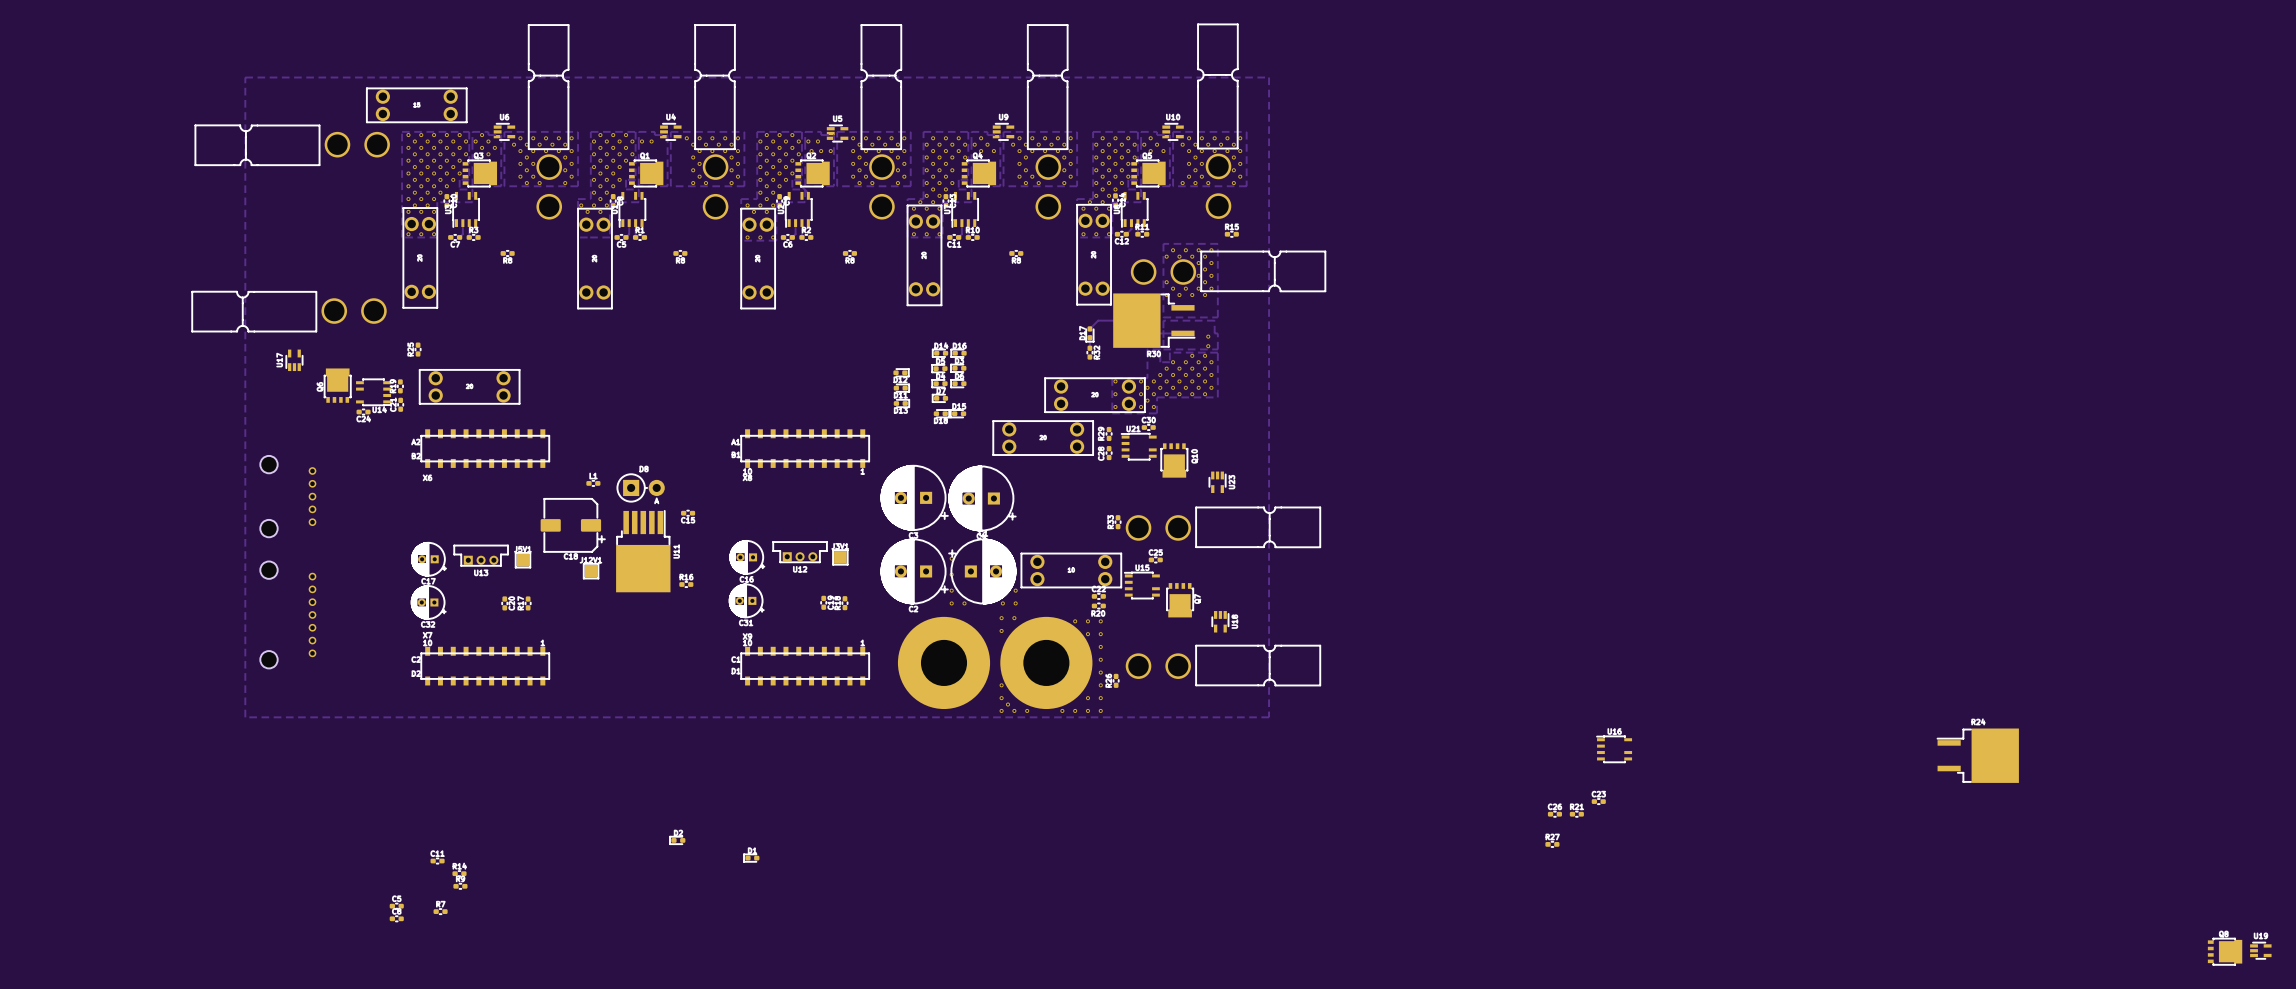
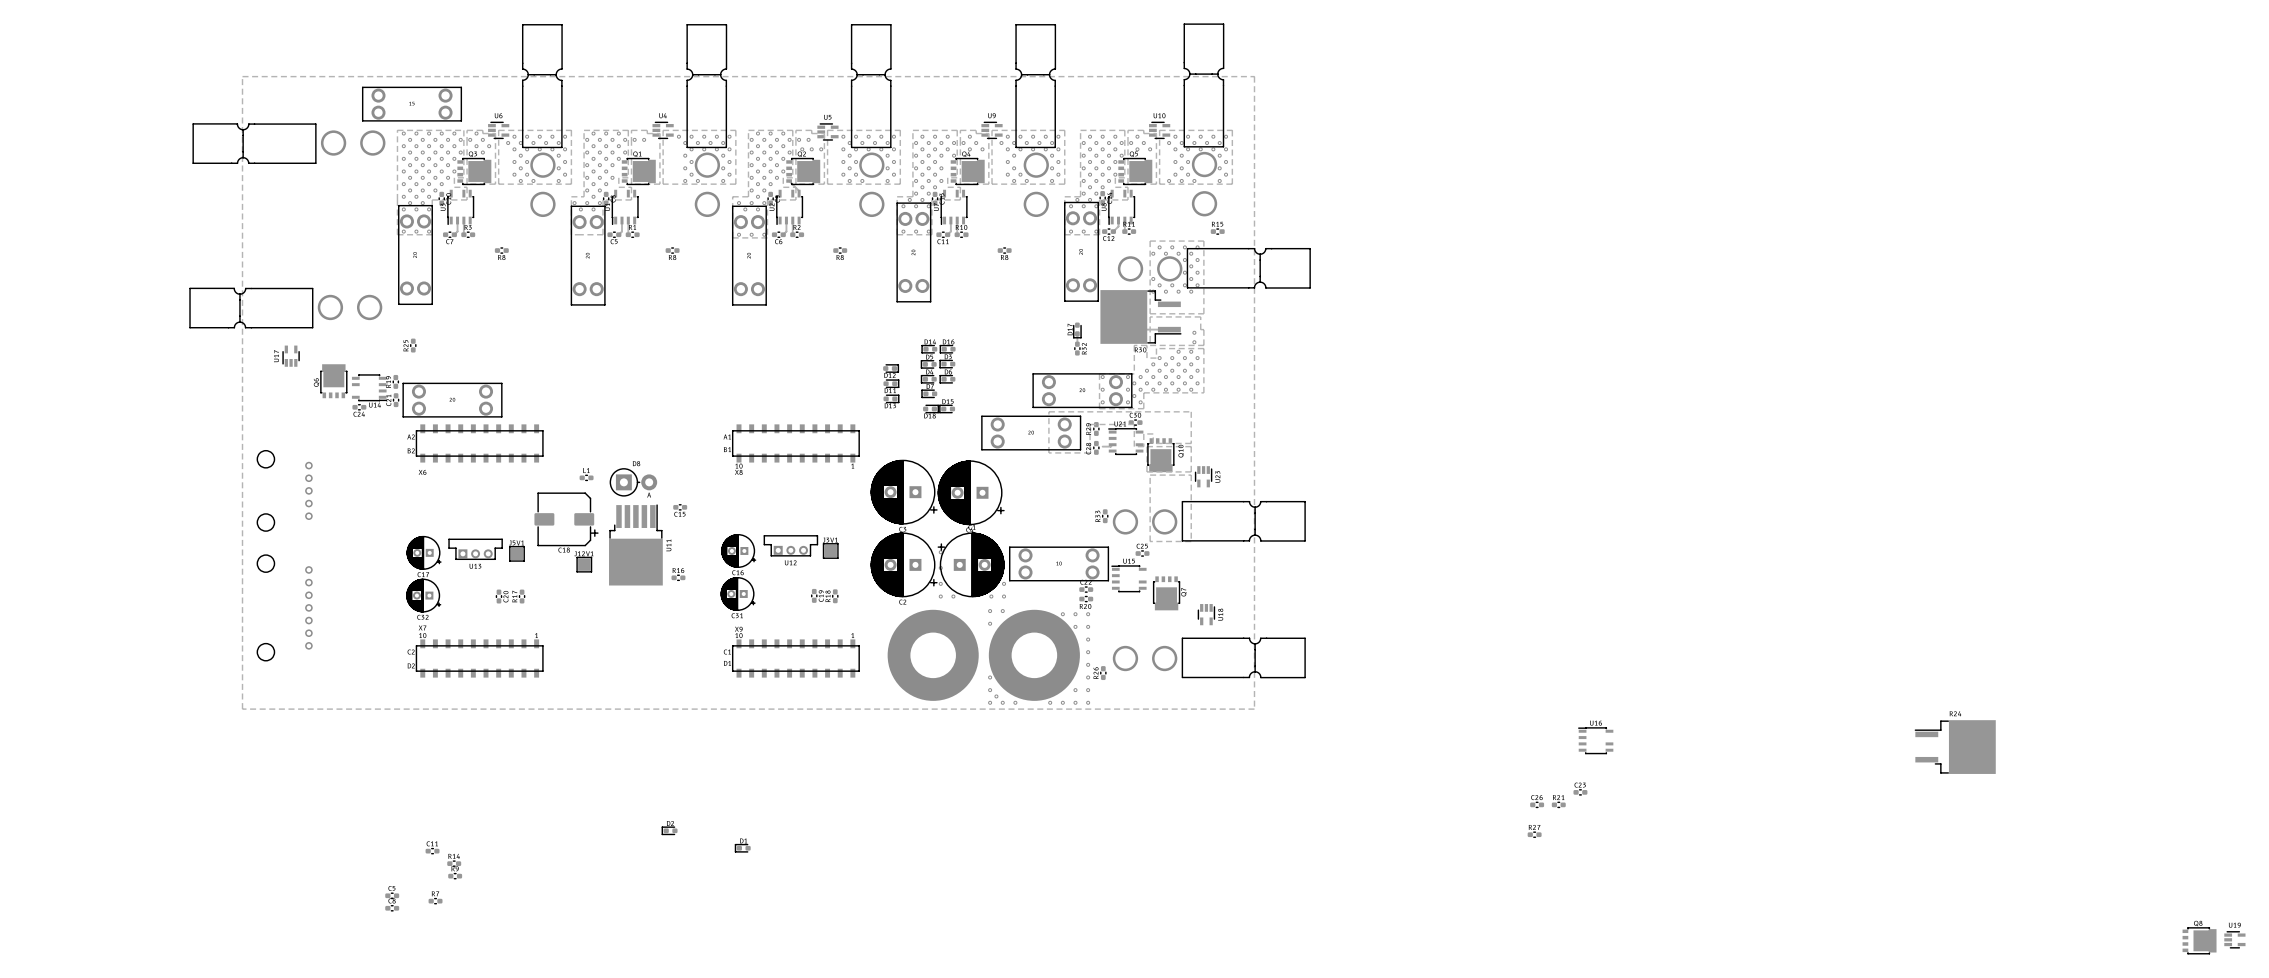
track: (1136, 320) (1098, 320) (1089, 328) -> none
part position: (469, 386) -> (452, 400)
zone outline: none -> (1048, 411) (1048, 452) (1090, 452) (1090, 424) (1134, 424) (1134, 446) (1143, 446) (1143, 433) (1153, 433) (1153, 443) (1191, 443) (1191, 411) (1048, 411)
track: none -> (1112, 444) (1110, 446) (1102, 446)
zone outline: none -> (1146, 446) (1146, 471) (1191, 471) (1191, 446) (1146, 446)
zone outline: none -> (1150, 475) (1150, 541) (1191, 541) (1191, 475) (1150, 475)

